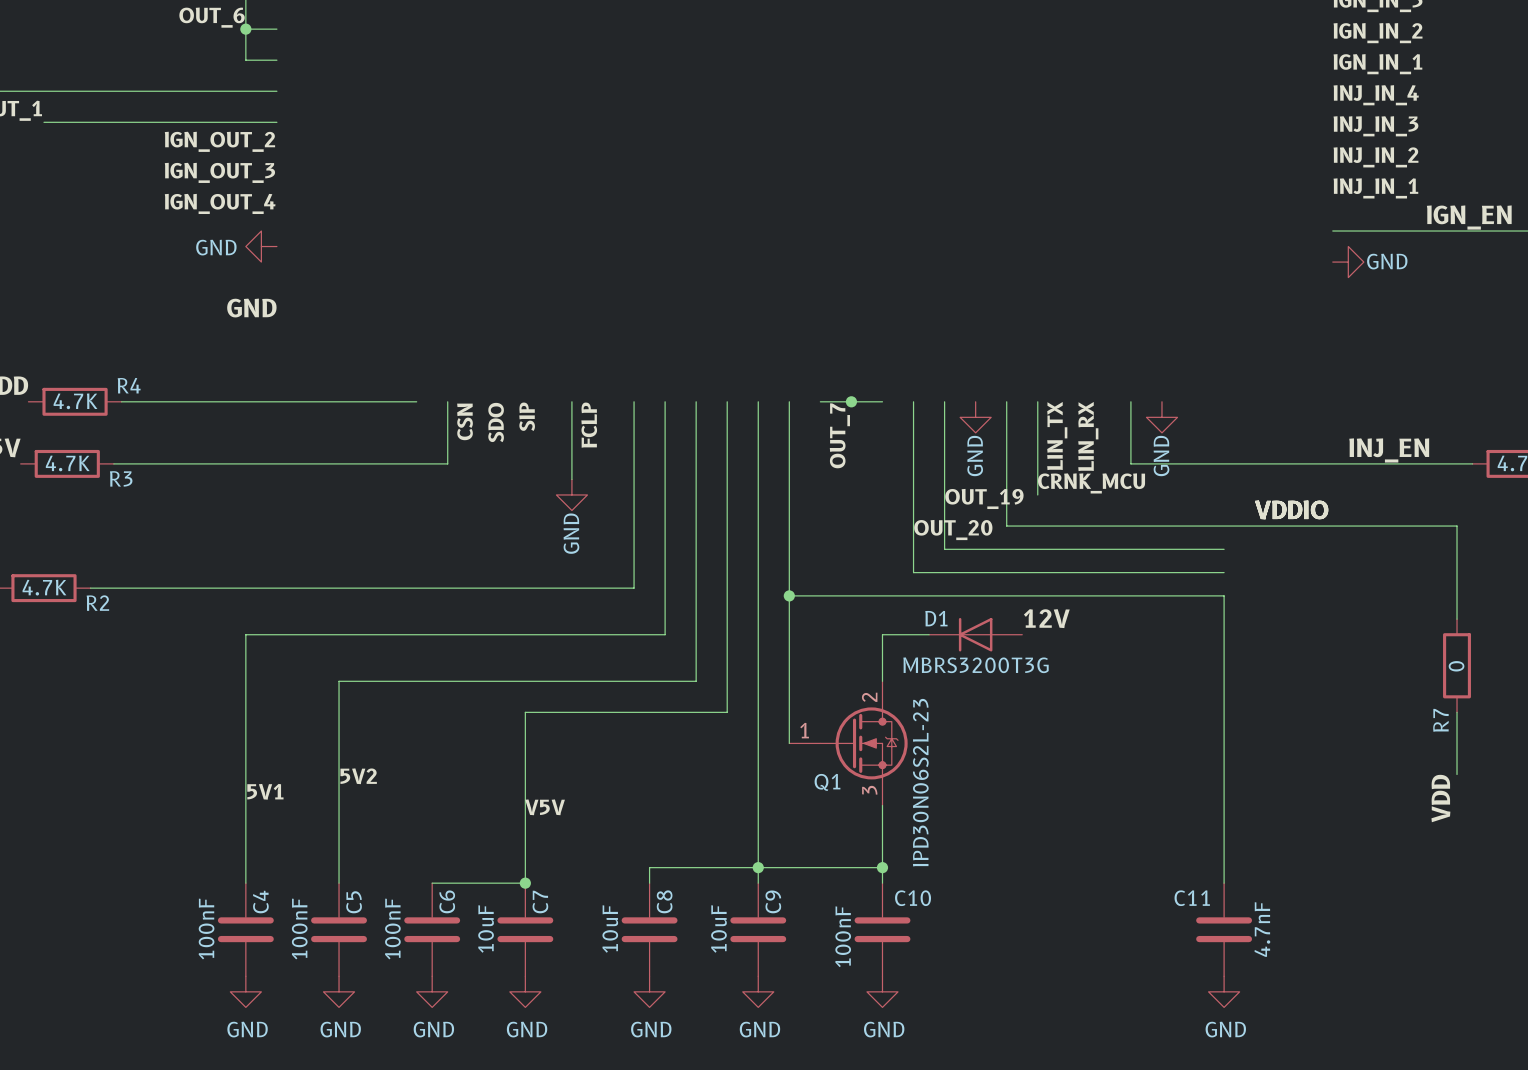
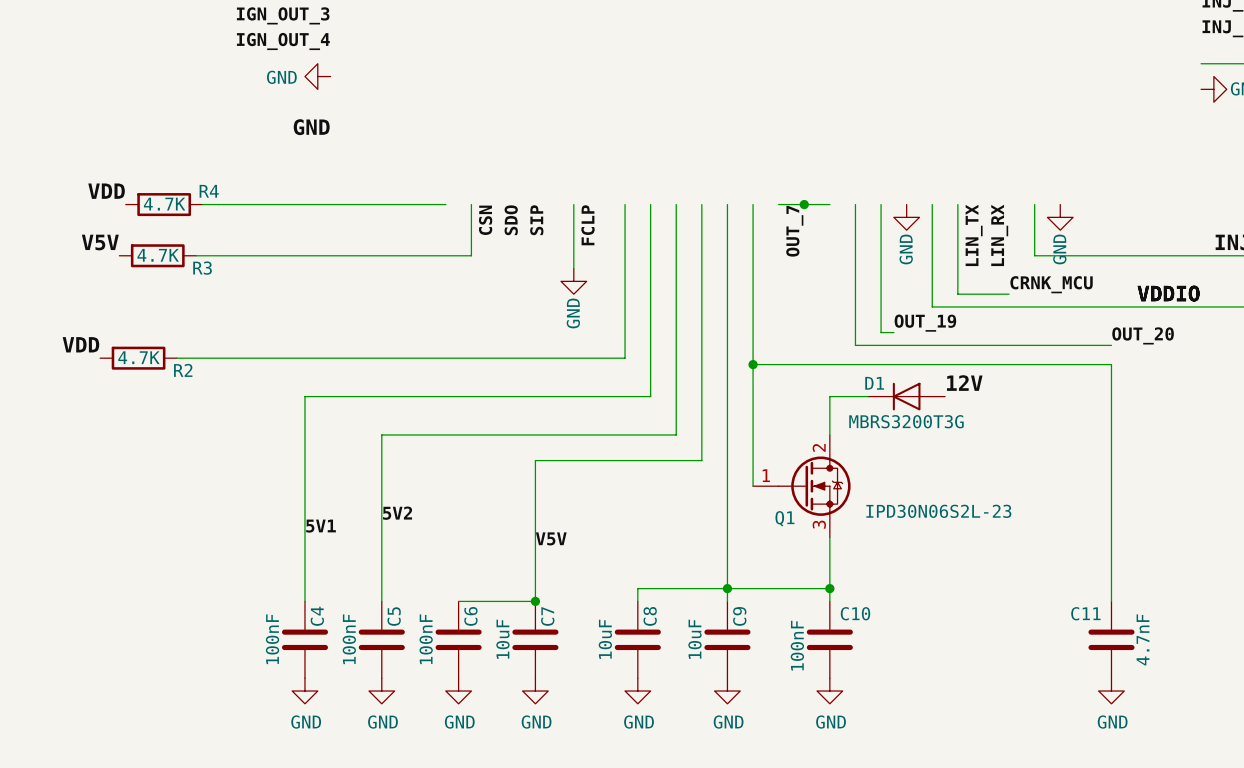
label position: CRNK_MCU (1091, 483) -> CRNK_MCU (1051, 284)
wire: none -> (957, 281) (957, 294) (1009, 294)
label position: OUT_19 (984, 498) -> OUT_19 (925, 323)
label: OUT_20 (953, 530) -> none
wire: (944, 549) (1224, 549) -> (881, 326) (881, 332) (893, 332)
label: none -> OUT_20 (1143, 335)
Q1 value rotation: 0° (920, 782) -> 90° clockwise (938, 511)

